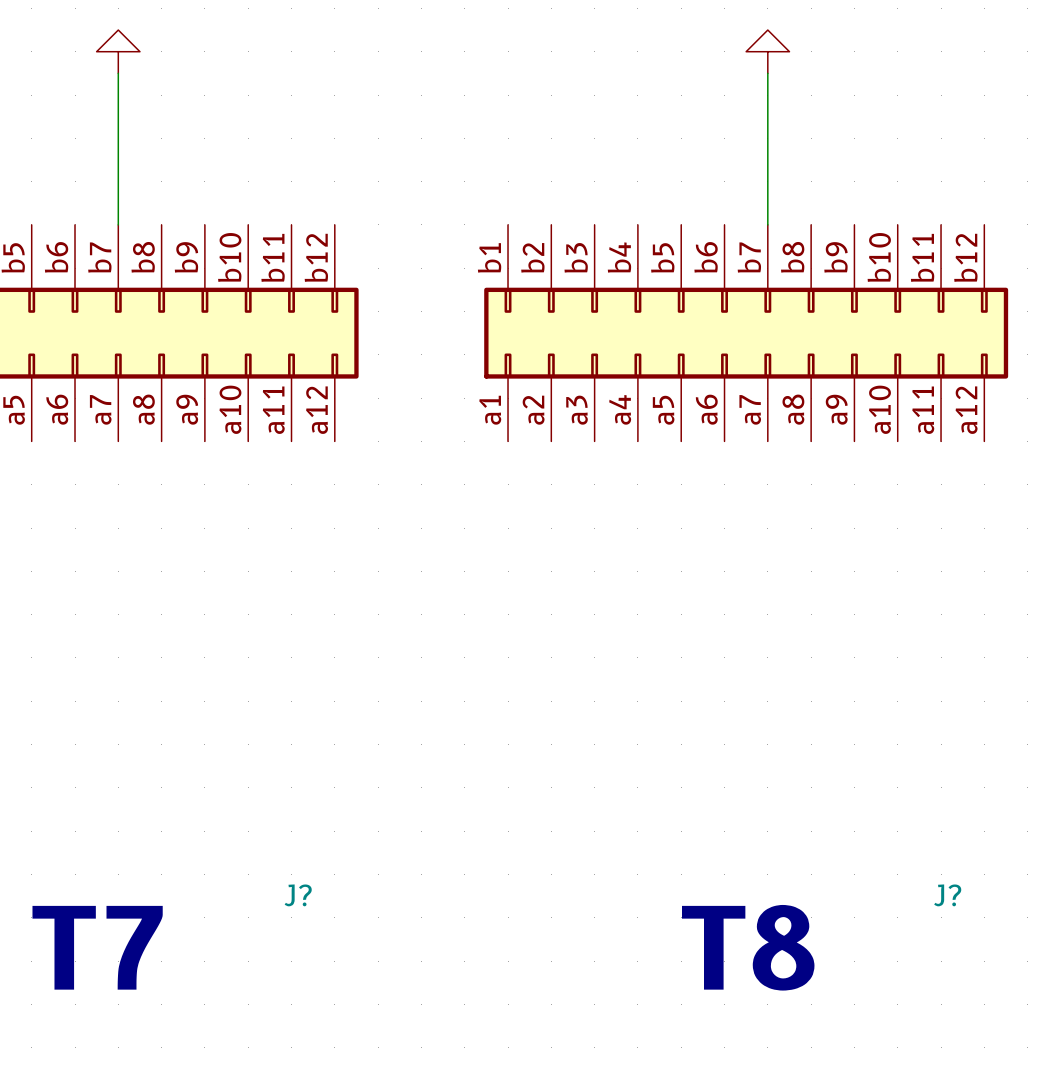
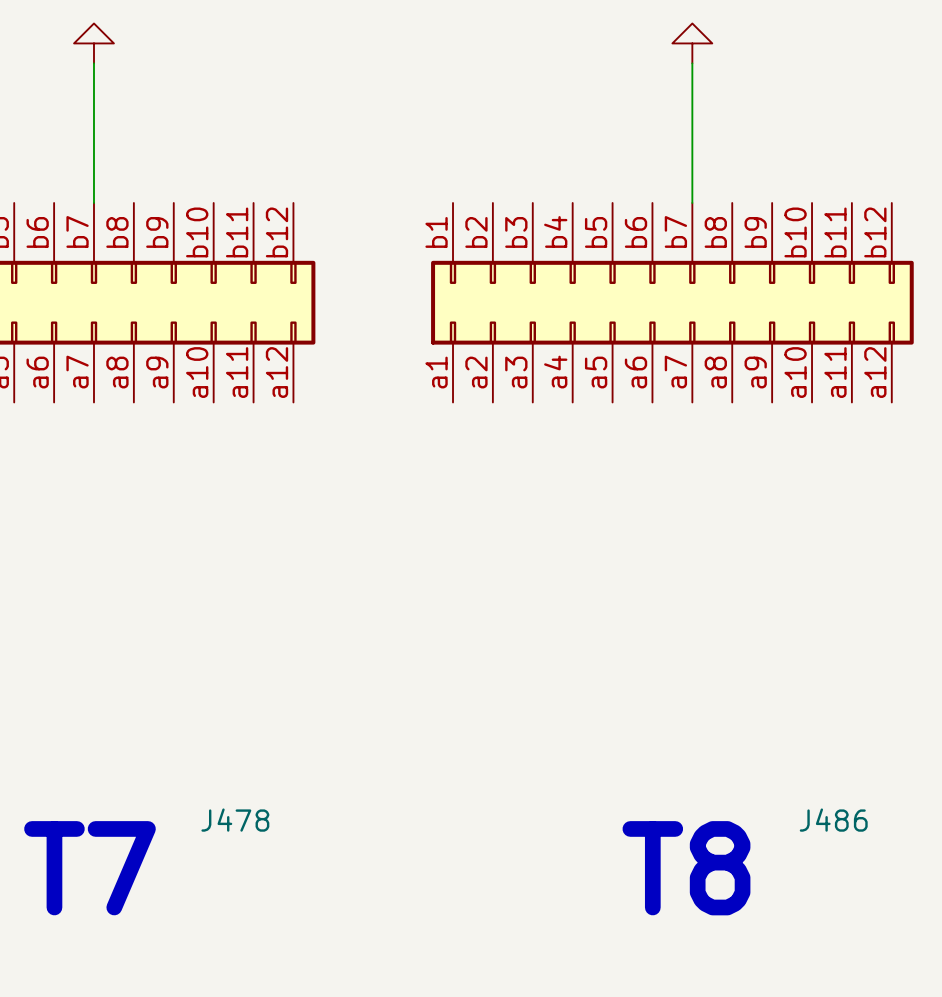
J? name: J? (298, 895) -> J478 (235, 820)
J? name: J? (947, 895) -> J486 (833, 820)

